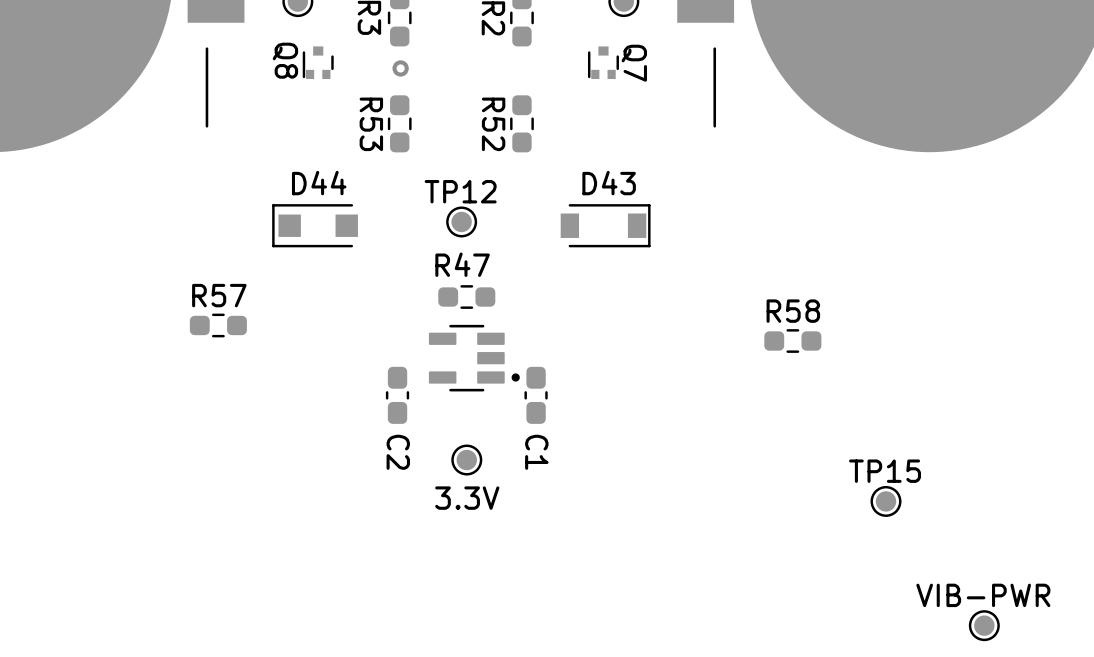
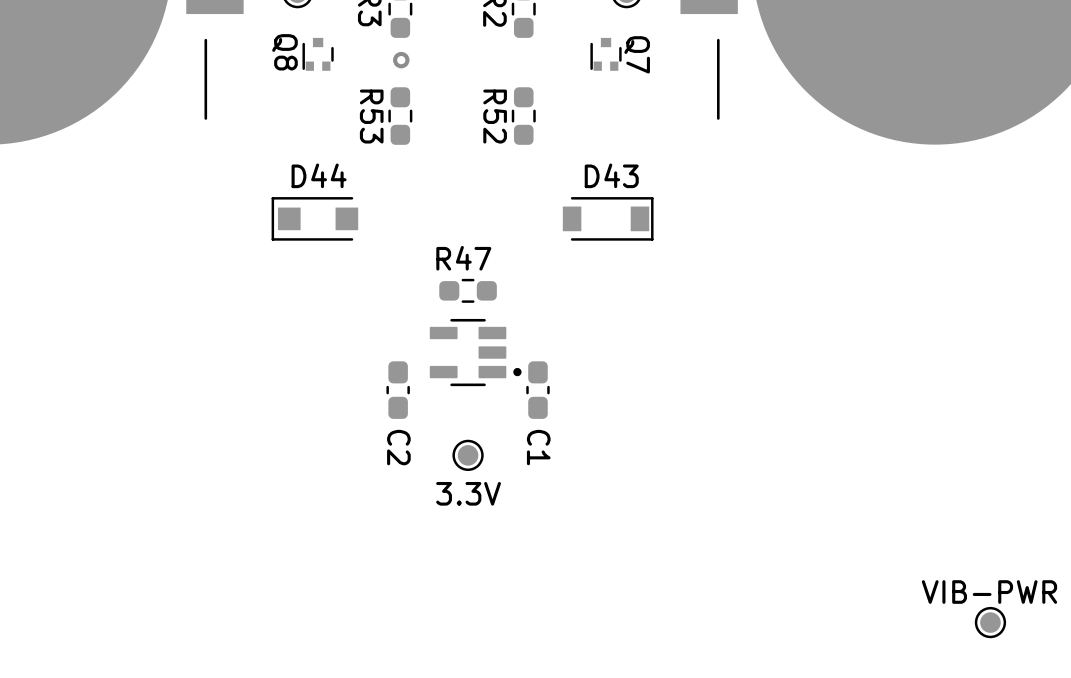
TP12: (461, 221) -> none
R57: (218, 325) -> none
R58: (792, 341) -> none
TP15: (886, 501) -> none

